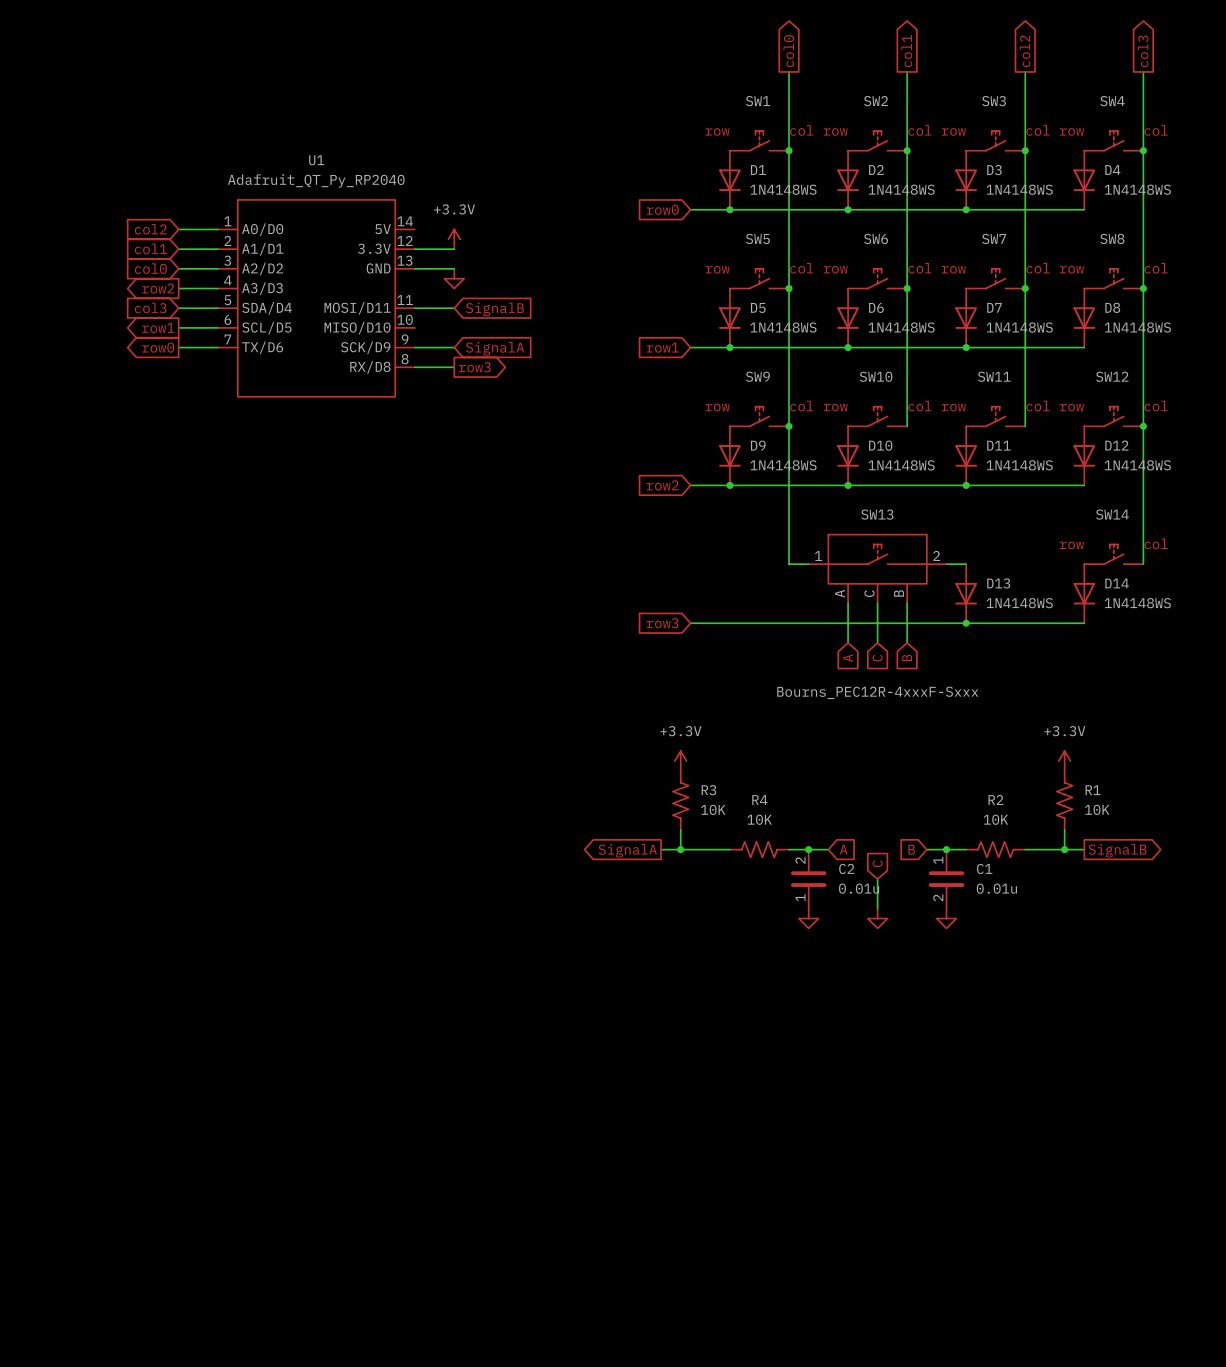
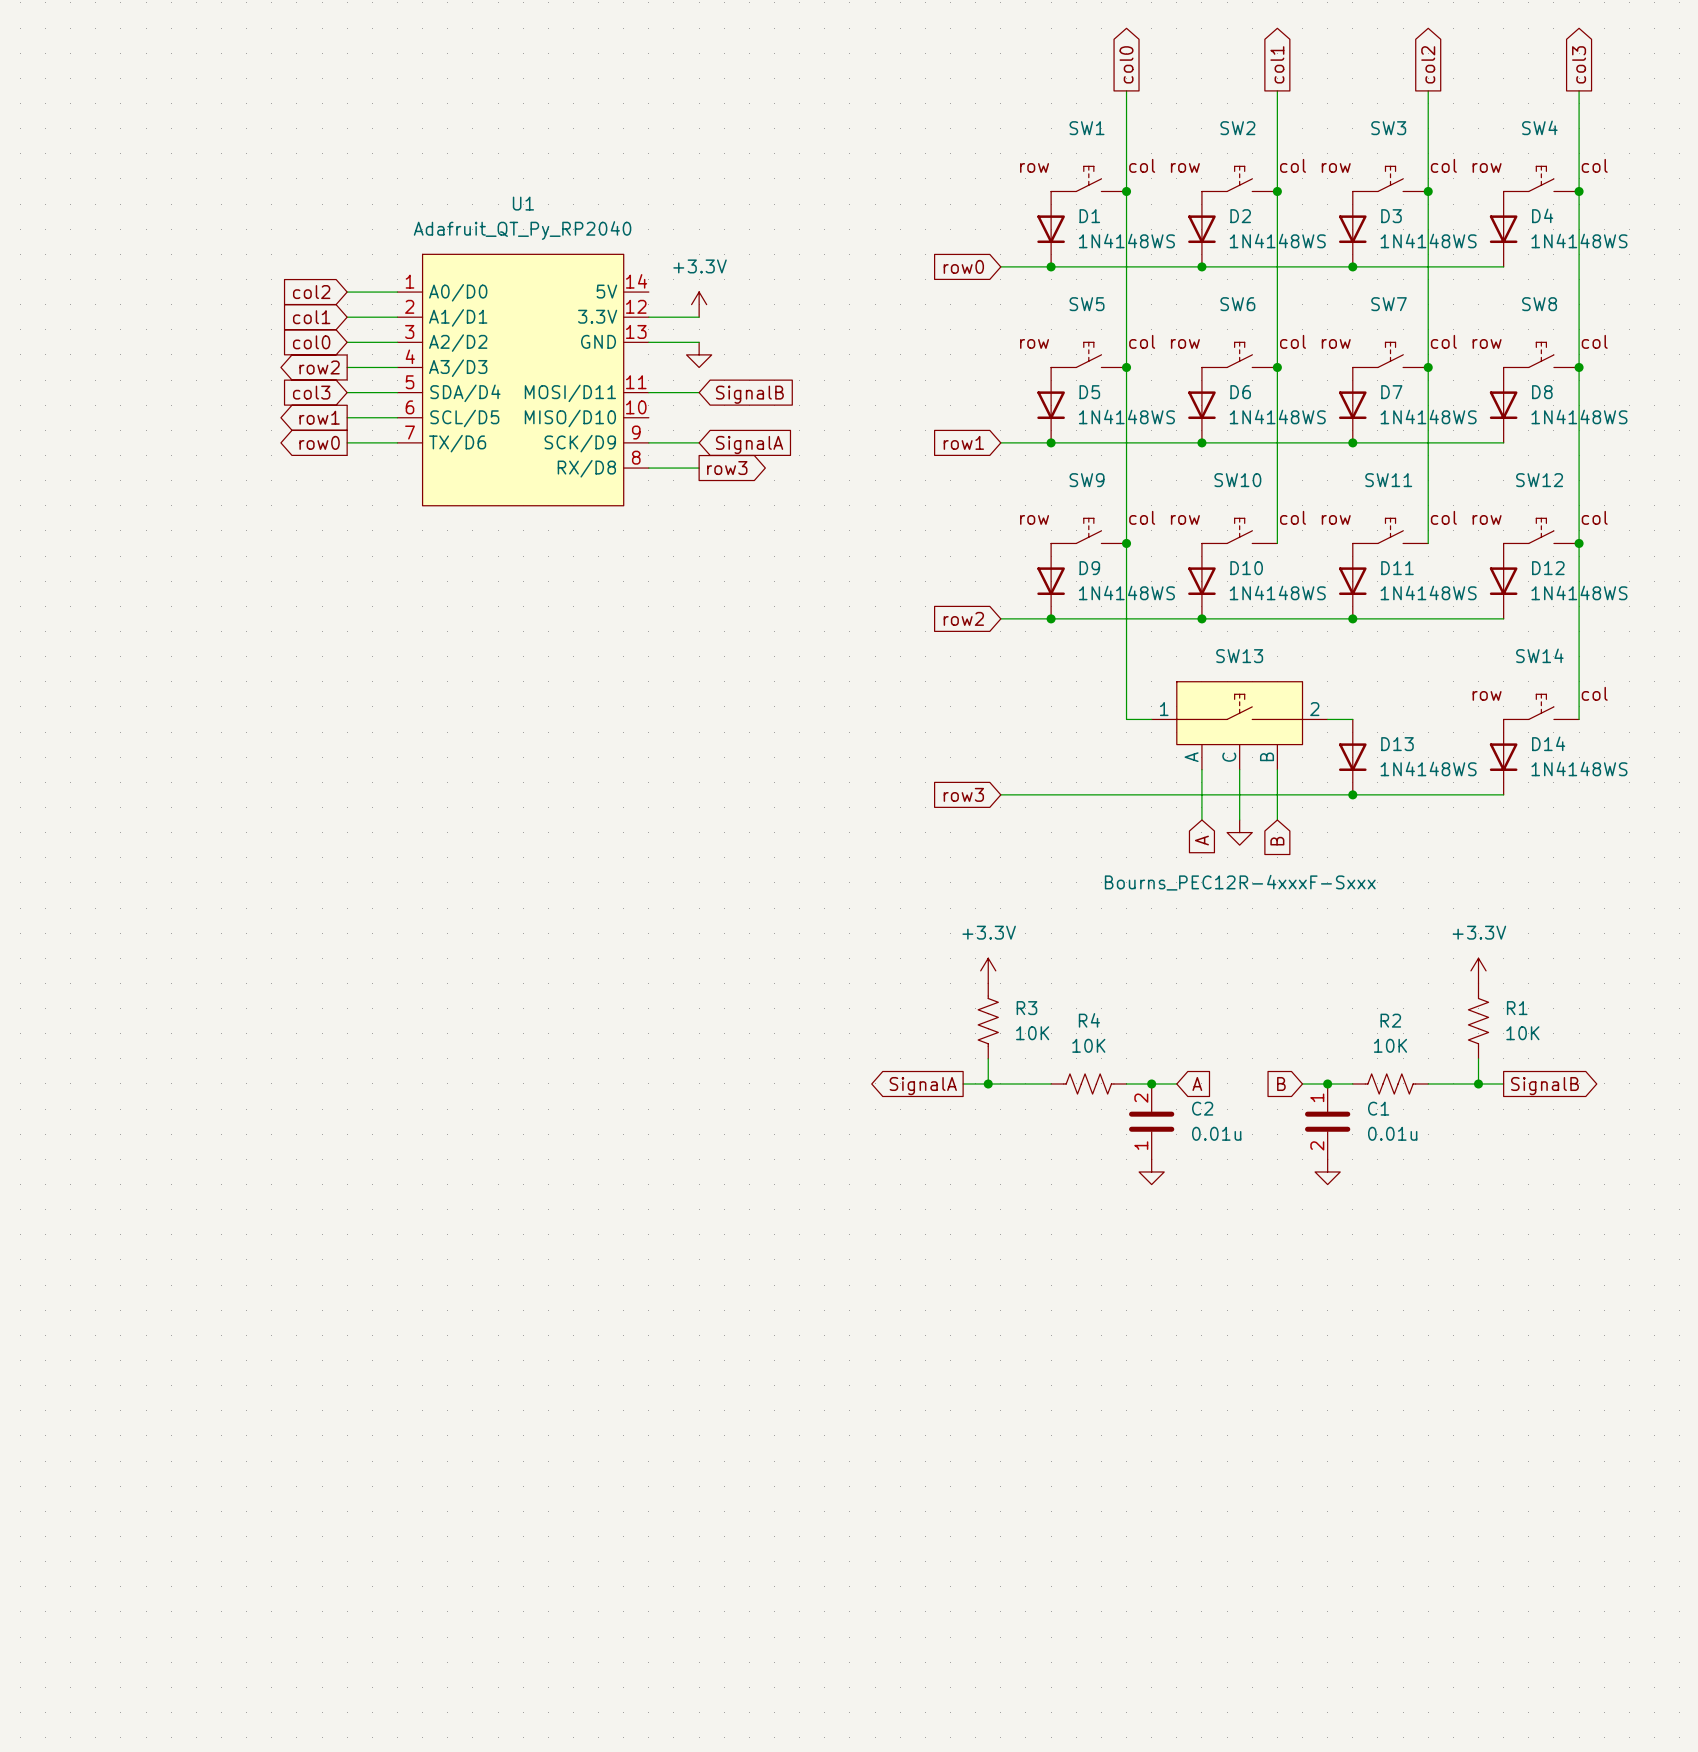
power symbol: none -> (1239, 832)
global label: C (877, 658) -> none
global label: C (877, 863) -> none
wire: (877, 879) (877, 908) -> none
power symbol: (877, 918) -> none

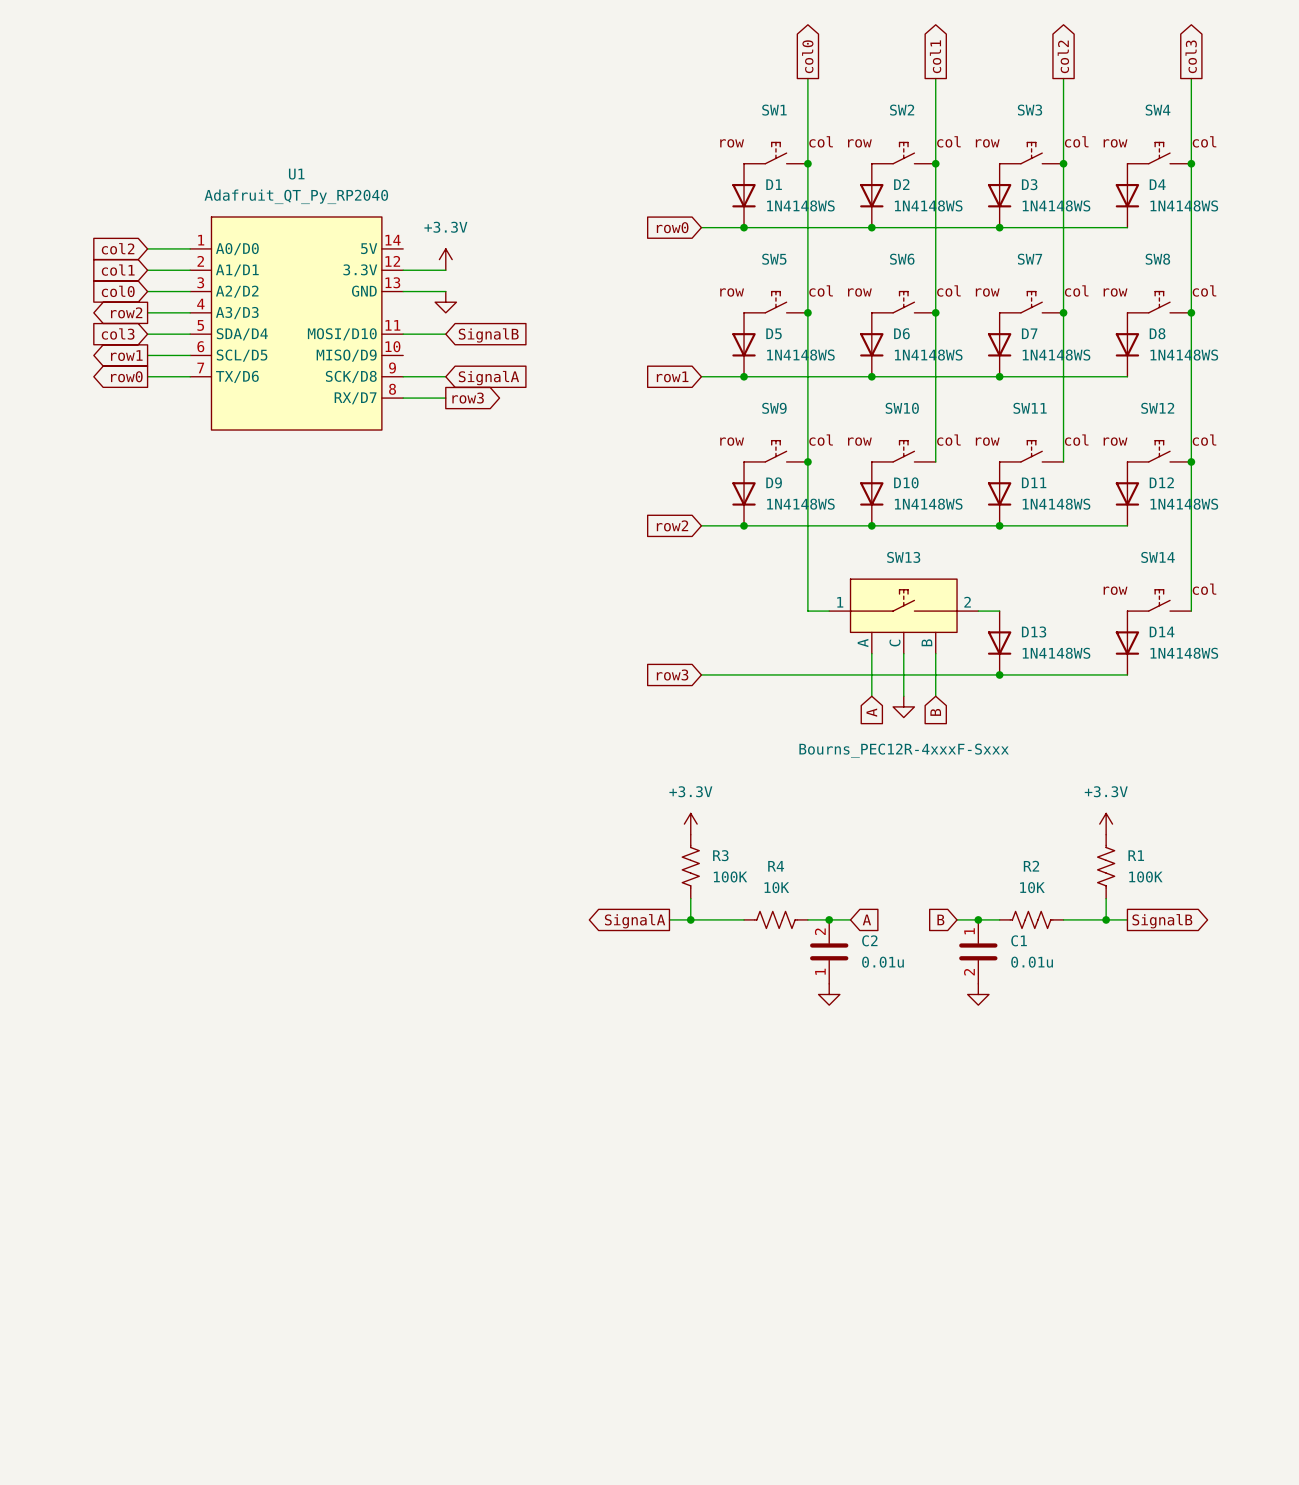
U1 pin name: MOSI/D11 (570, 393) -> MOSI/D10 (342, 334)
U1 pin name: MISO/D10 (570, 418) -> MISO/D9 (346, 355)
U1 pin name: SCK/D9 (580, 443) -> SCK/D8 (351, 376)
U1 pin name: RX/D8 (586, 468) -> RX/D7 (355, 398)
R3 value: 10K (1032, 1033) -> 100K (730, 876)
R1 value: 10K (1522, 1033) -> 100K (1145, 876)

